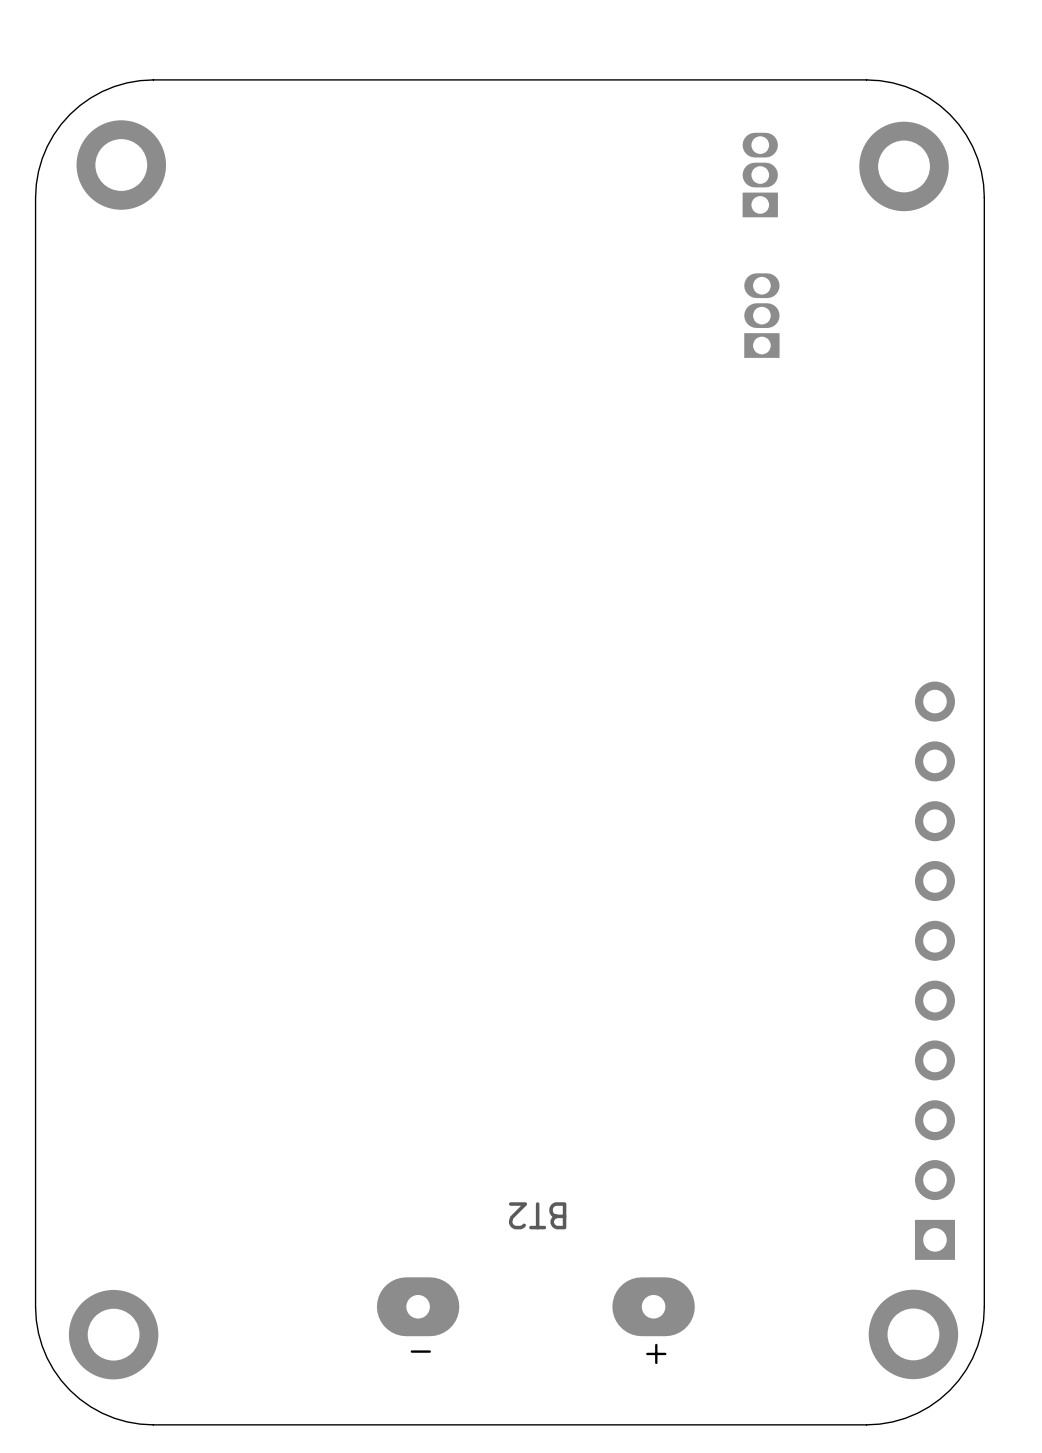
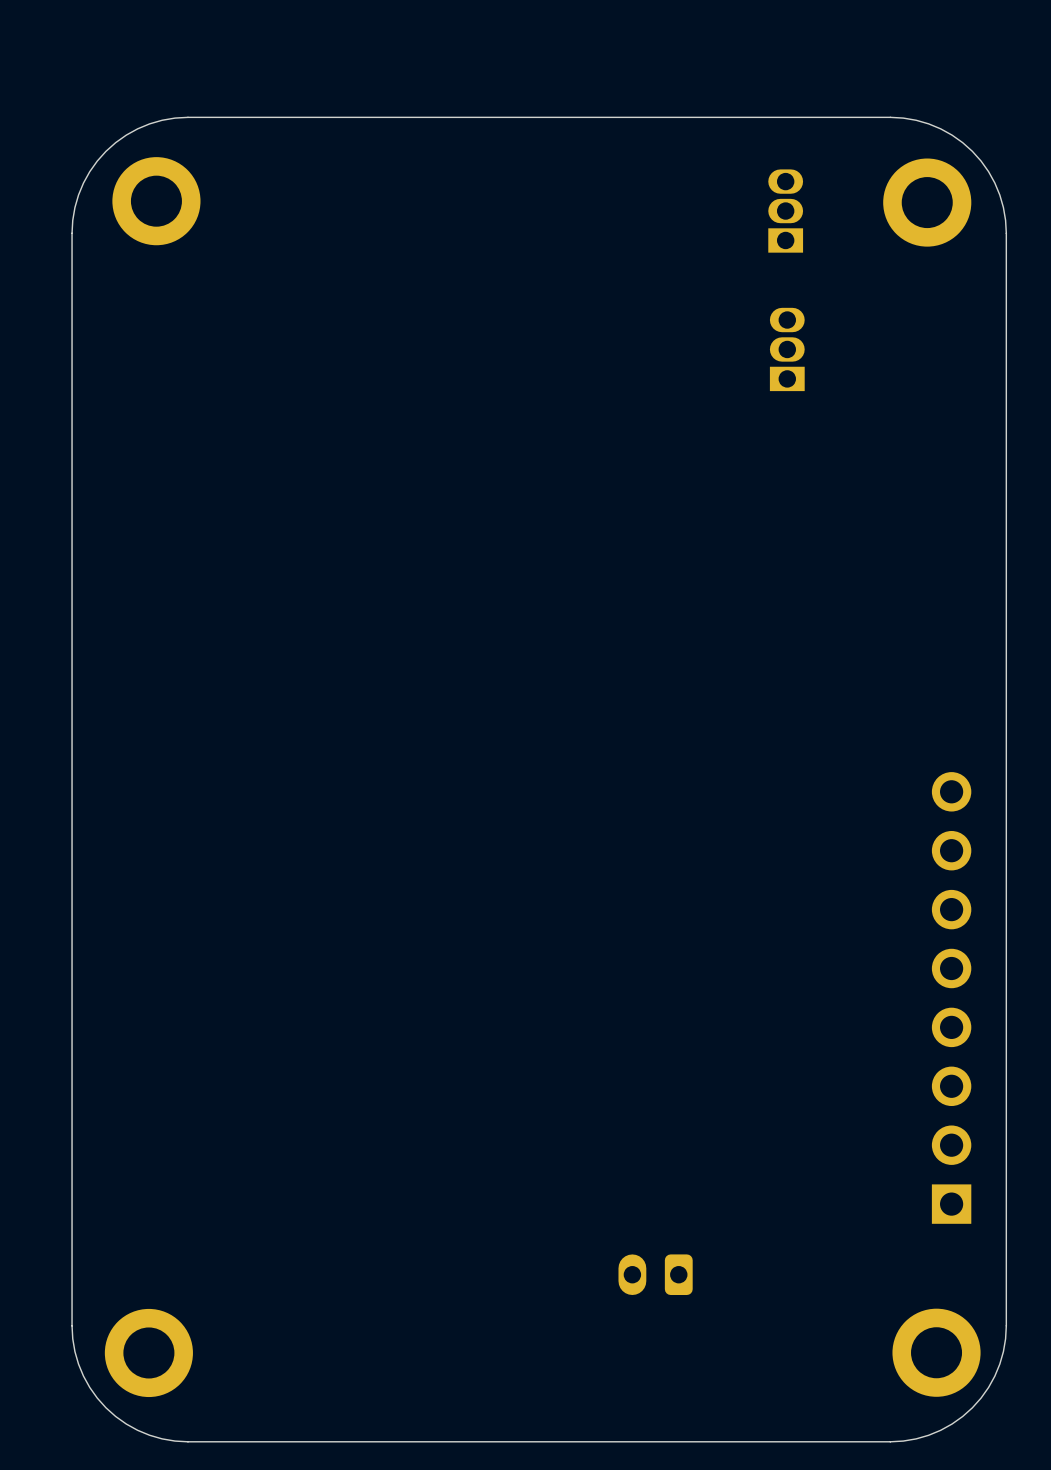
part footprint: [914, 681, 956, 1260] -> [931, 772, 972, 1224]
part: none -> (655, 1274)
BT2: (535, 1306) -> none

